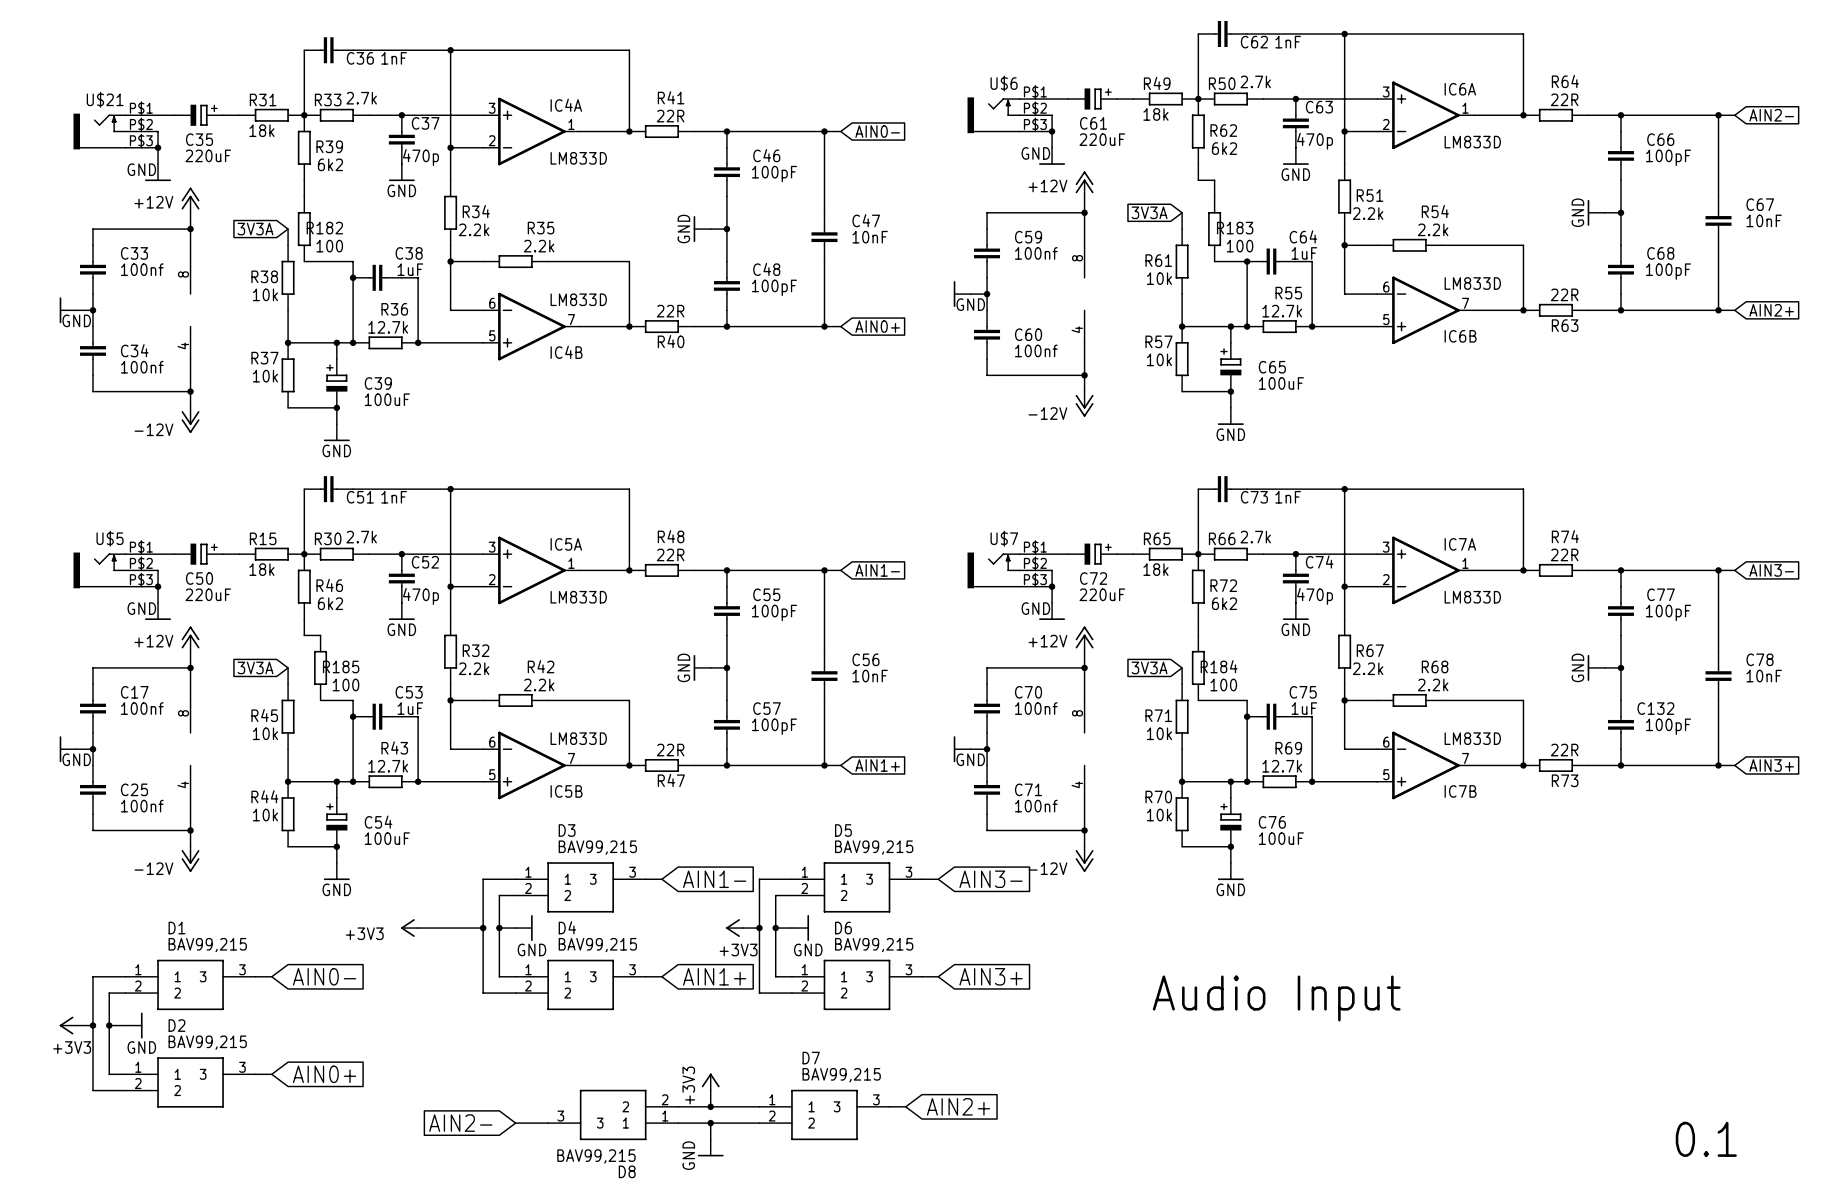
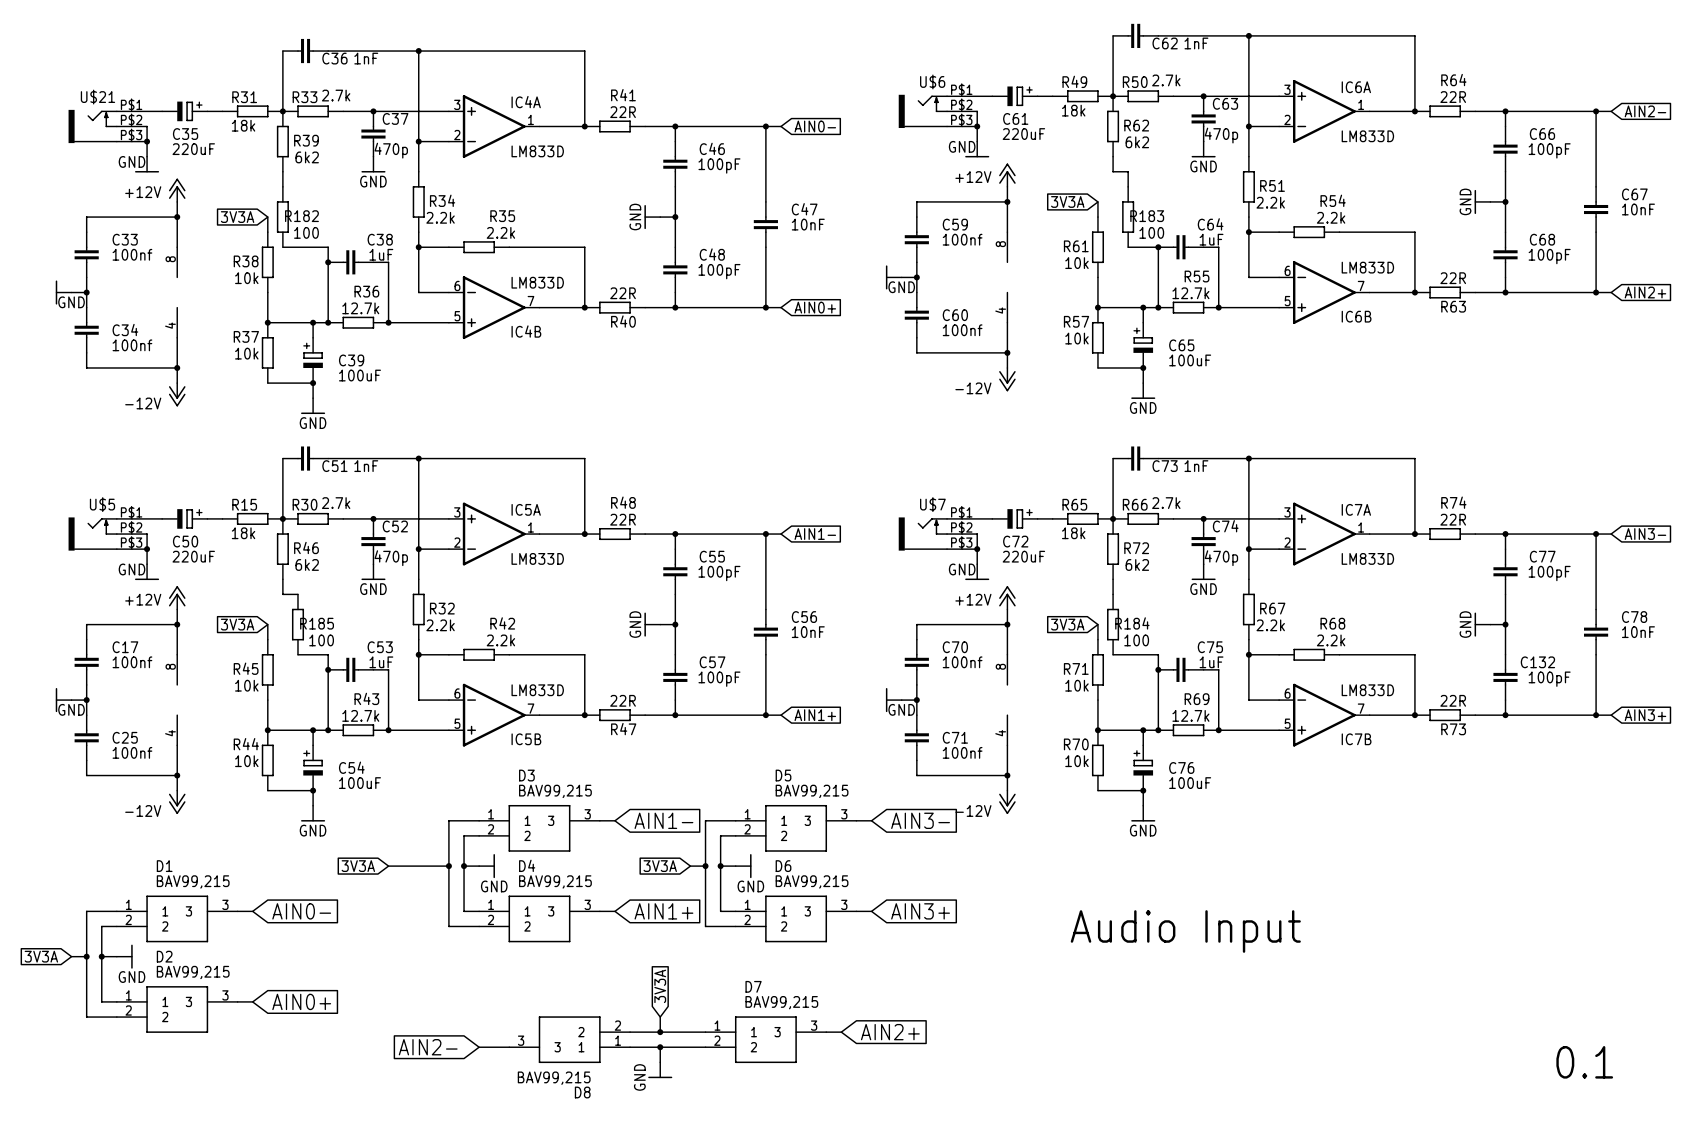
global label: none -> 3V3A (358, 866)
power symbol: +3V3 (409, 928) -> none
global label: none -> 3V3A (660, 866)
power symbol: +3V3 (734, 928) -> none
global label: none -> 3V3A (41, 956)
power symbol: +3V3 (68, 1025) -> none
global label: none -> 3V3A (660, 986)
power symbol: +3V3 (710, 1082) -> none

